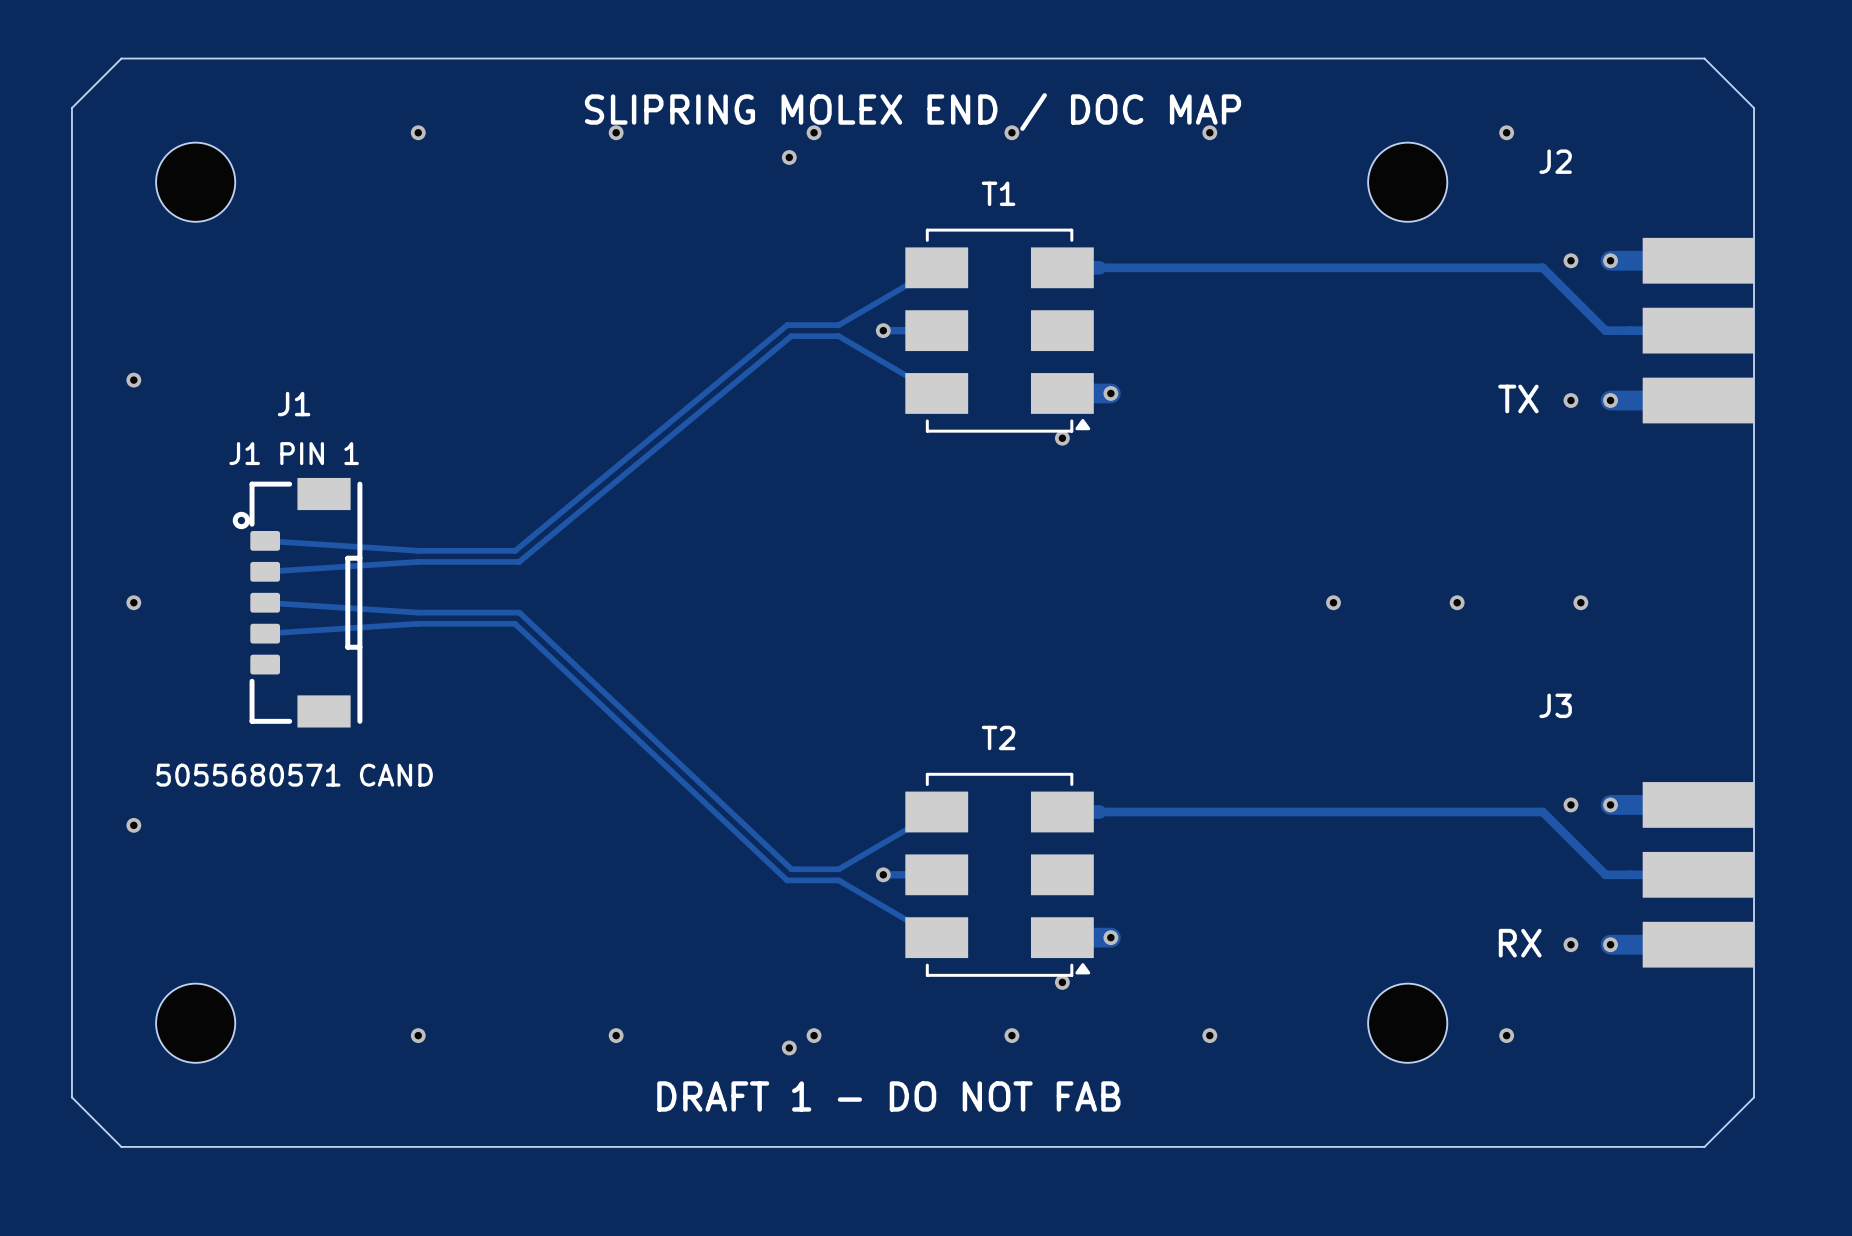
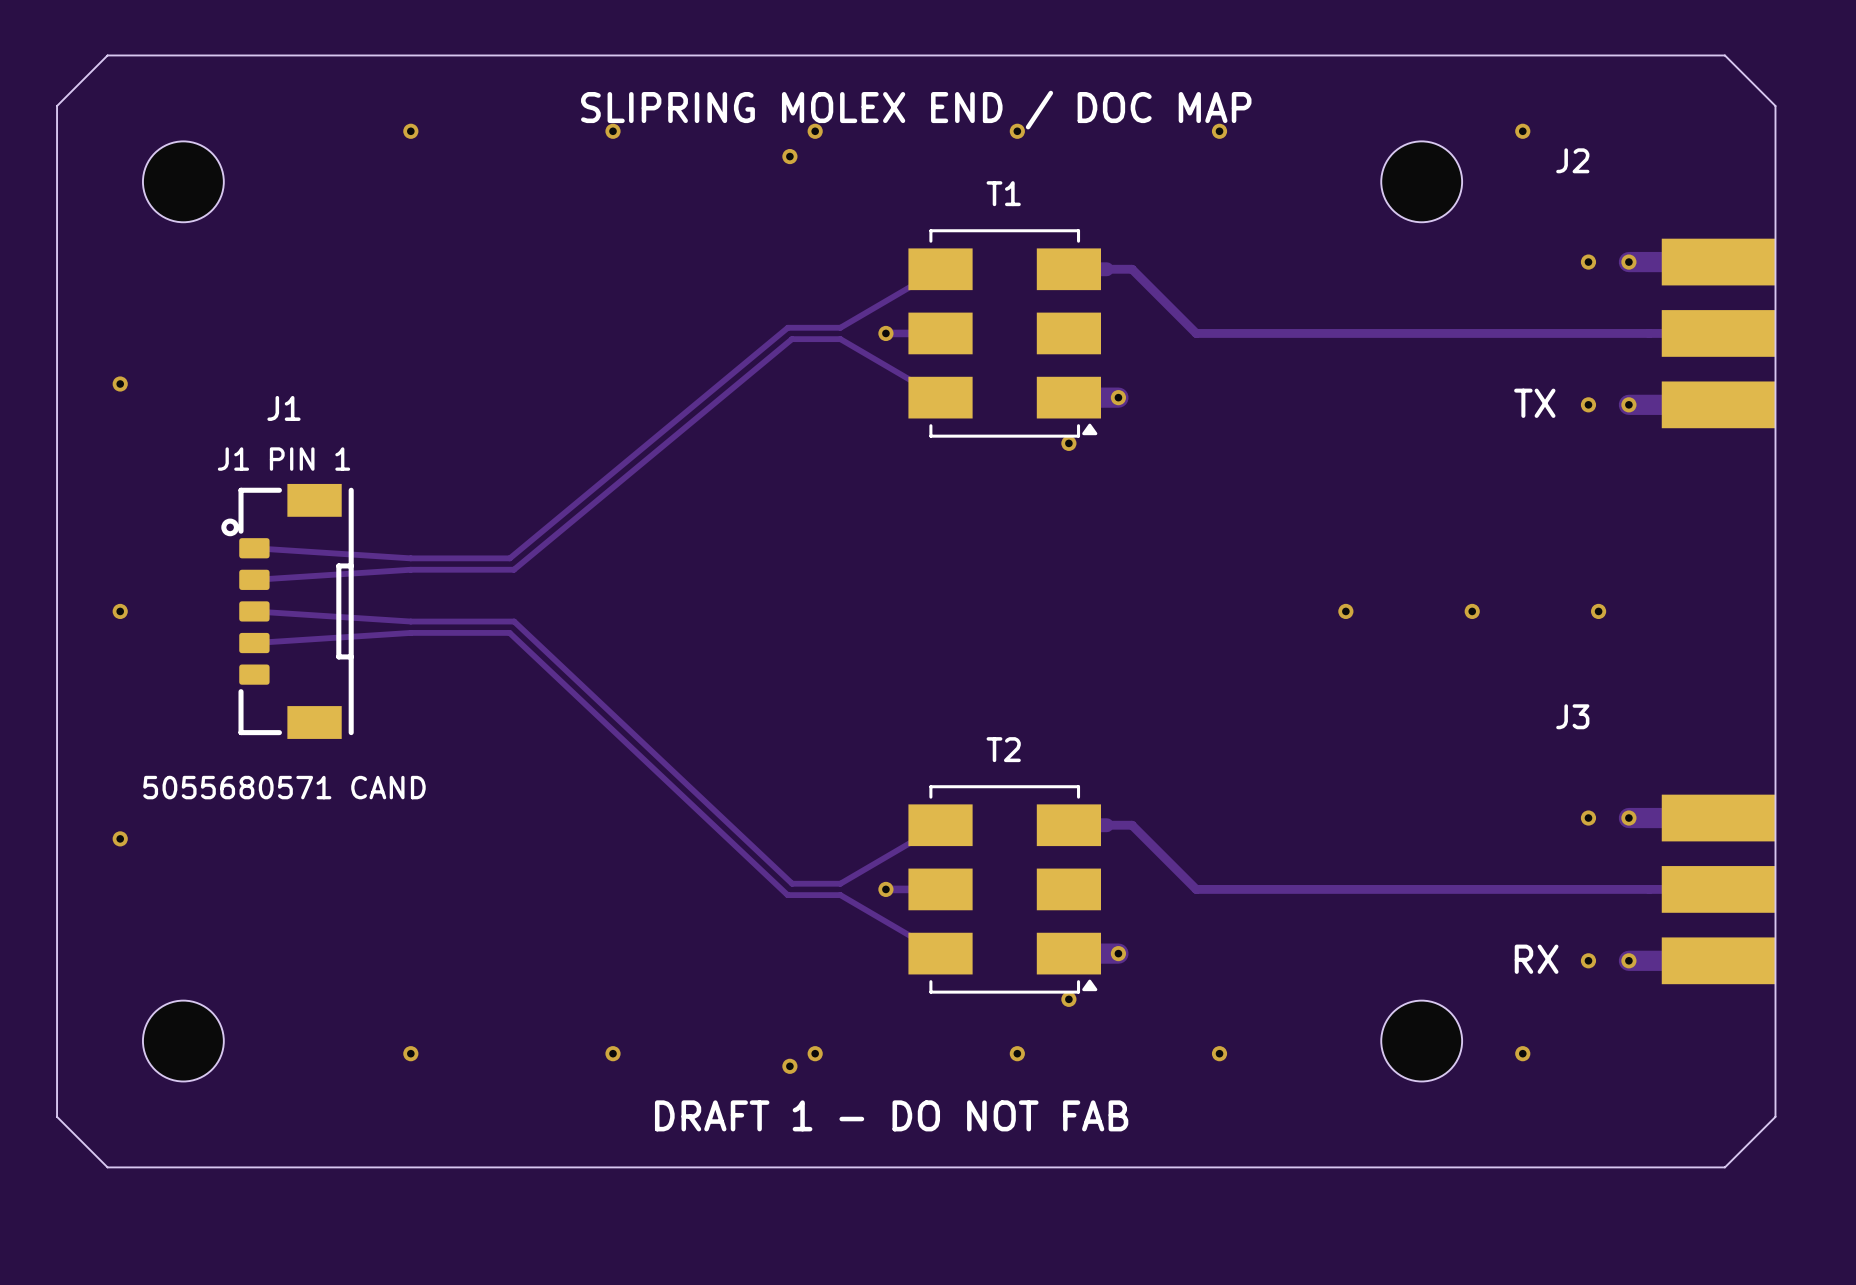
track: (1124, 267) (1542, 267) (1605, 330) -> (1132, 269) (1196, 333) (1623, 333)
track: (1124, 811) (1542, 811) (1605, 874) -> (1132, 825) (1196, 889) (1623, 889)

